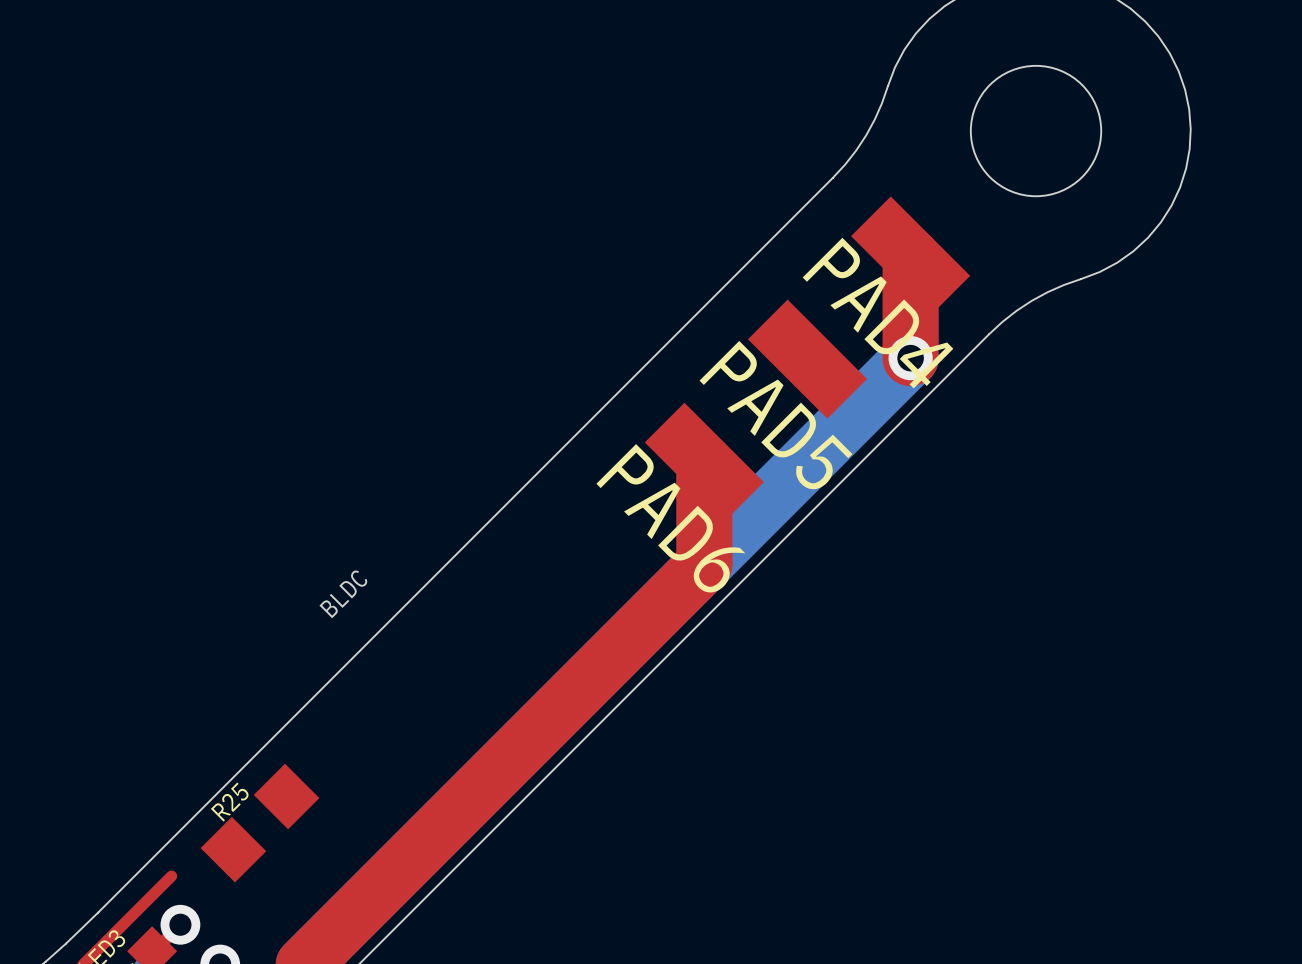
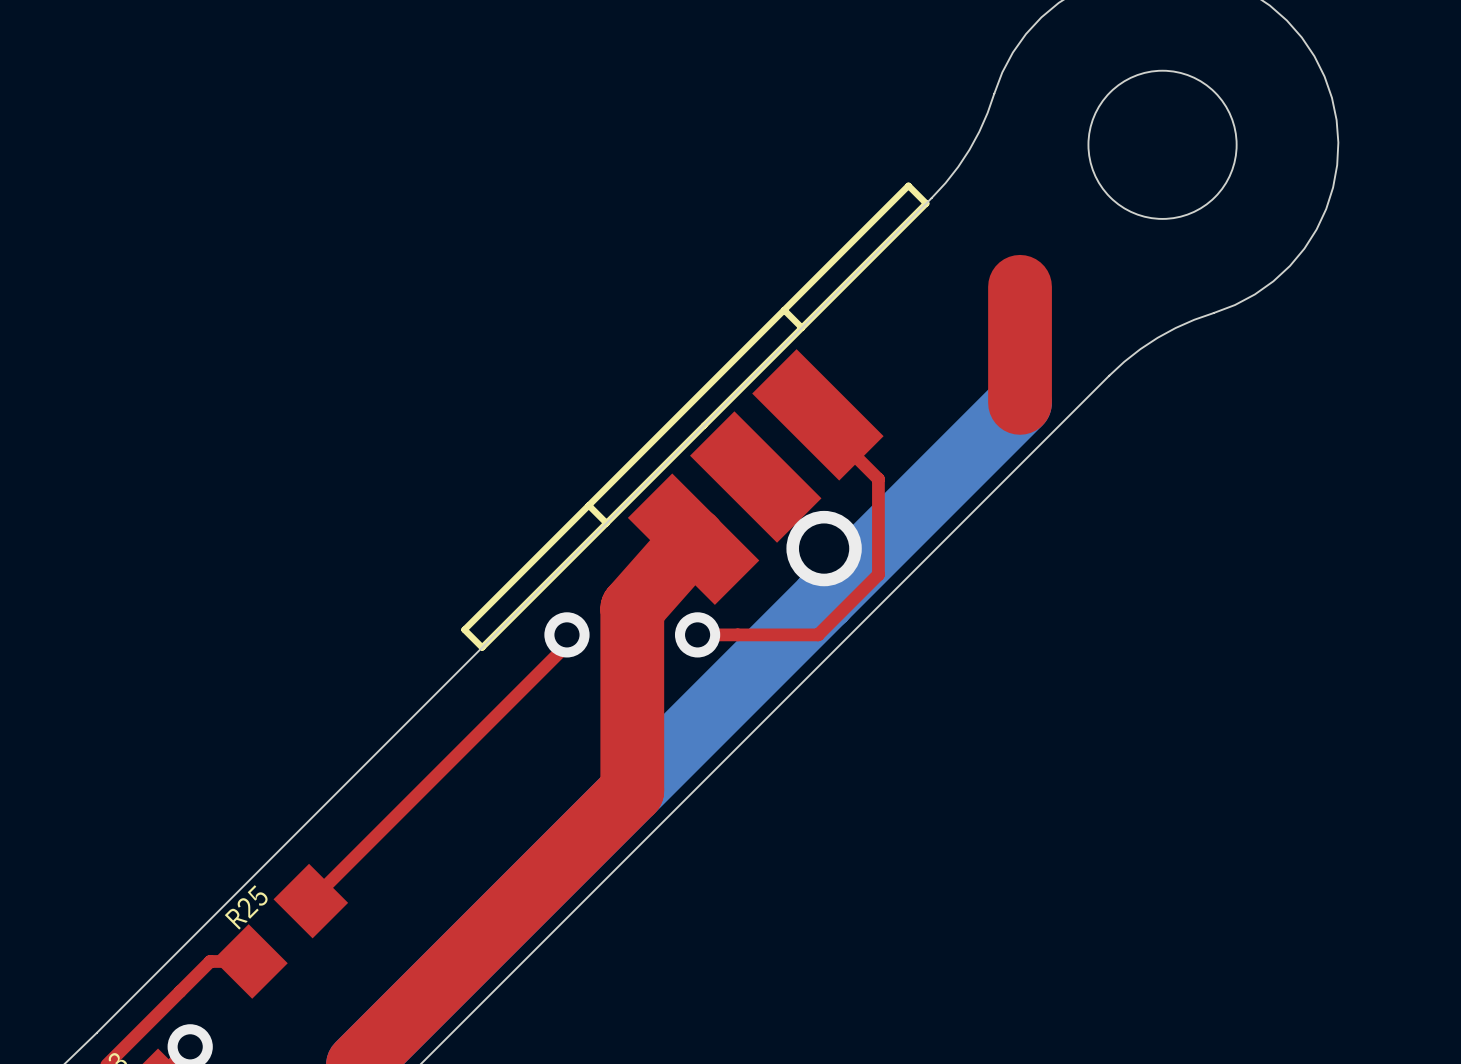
PAD4: (910, 256) -> none
via: (910, 358) -> none
PAD5: (807, 359) -> none
top track: none -> (817, 414) (817, 418) (878, 479) (878, 574) (818, 634) (697, 634)
part: none -> (695, 416)
top track: (704, 462) (704, 564) (569, 699) -> (693, 539) (632, 608) (632, 790)
PAD6: (704, 462) -> none
via: none -> (824, 548)
top track: none -> (566, 634) (566, 644) (310, 901)
via: none -> (566, 634)
via: none -> (697, 634)
text: BLDC (343, 594) -> none
top track: none -> (250, 961) (210, 961) (180, 991)

